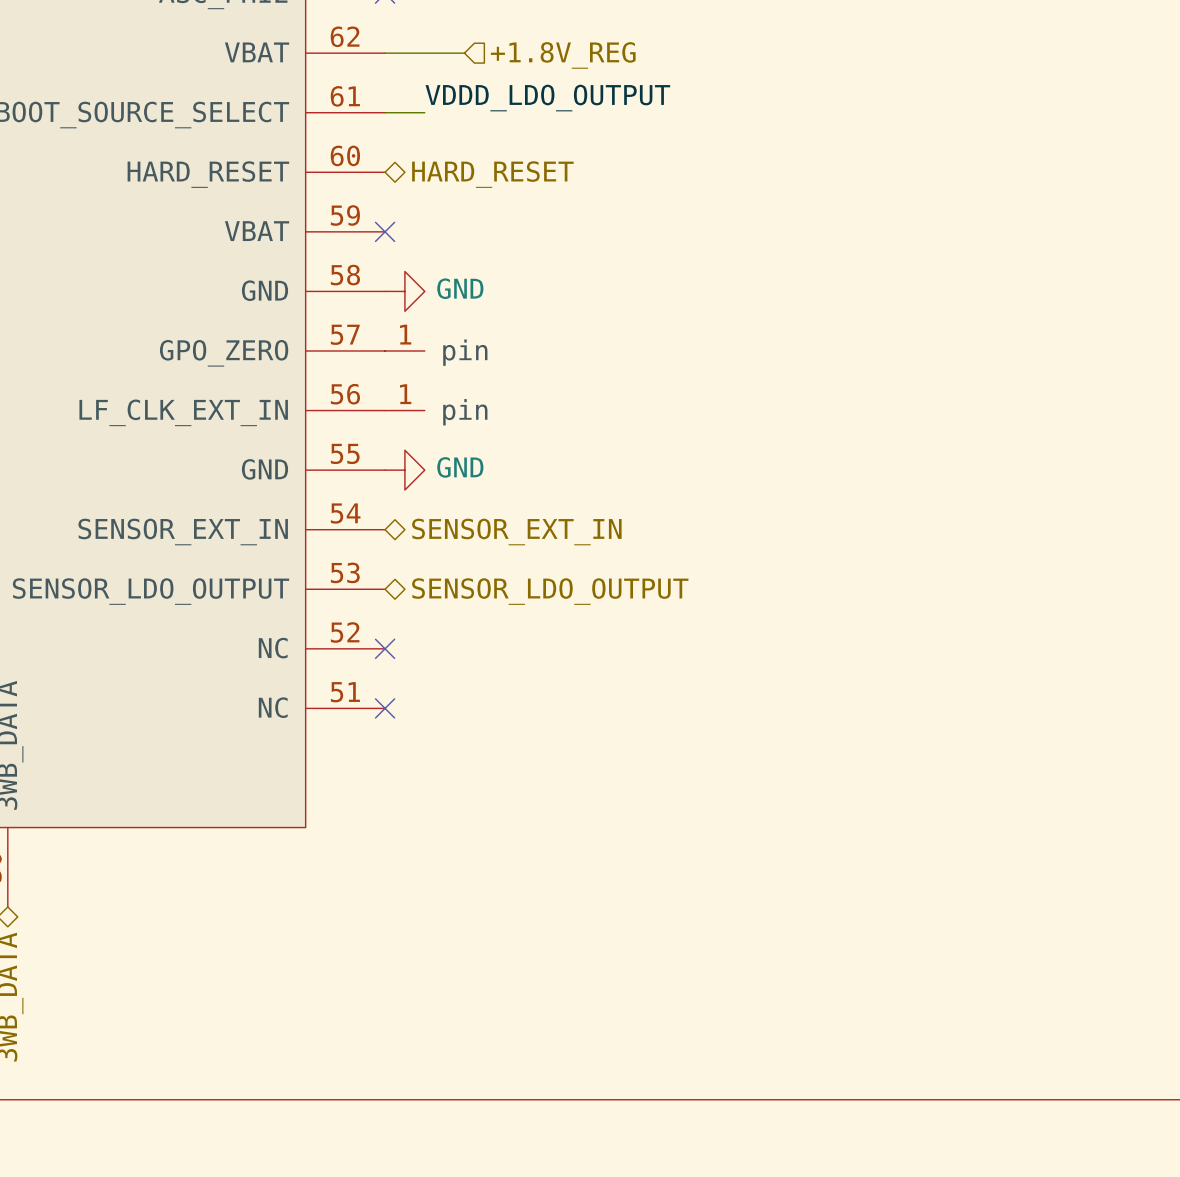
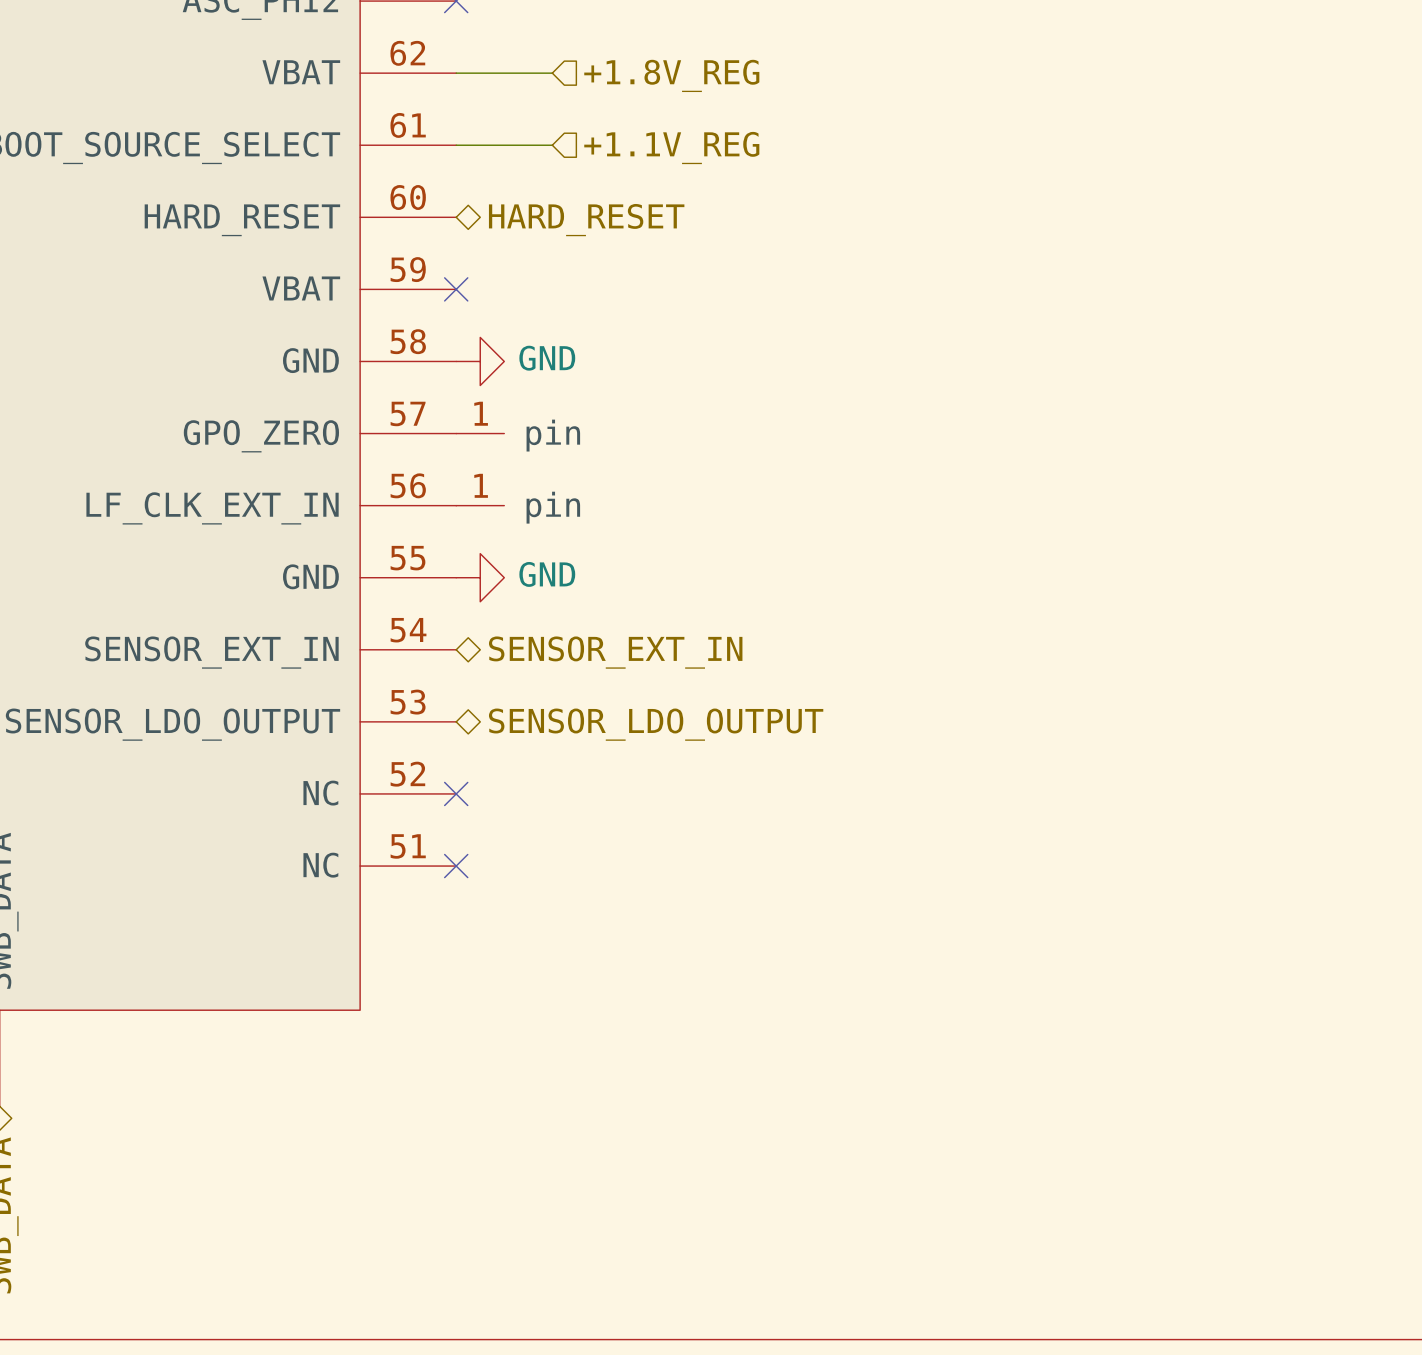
label: VDDD_LDO_OUTPUT (547, 98) -> none
wire: none -> (504, 145) (552, 145)
hierarchical label: none -> +1.1V_REG (671, 147)

